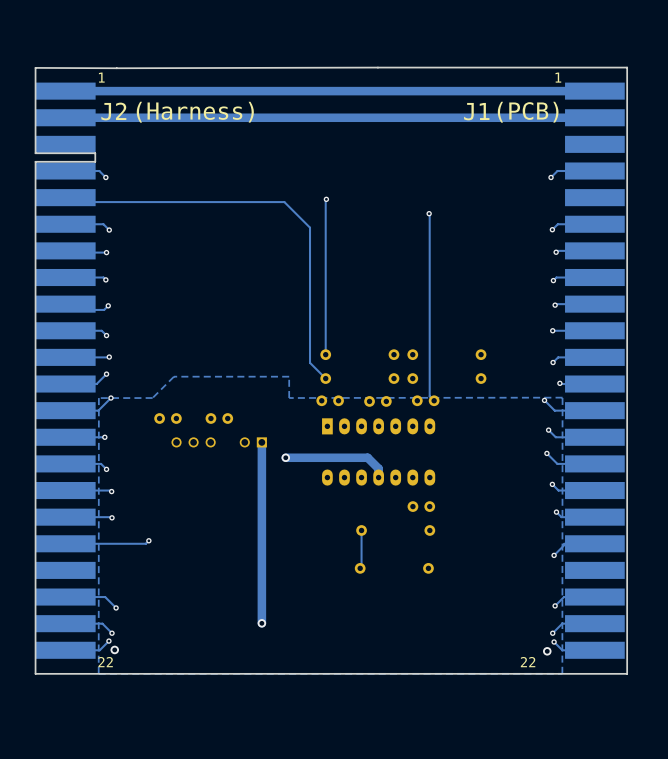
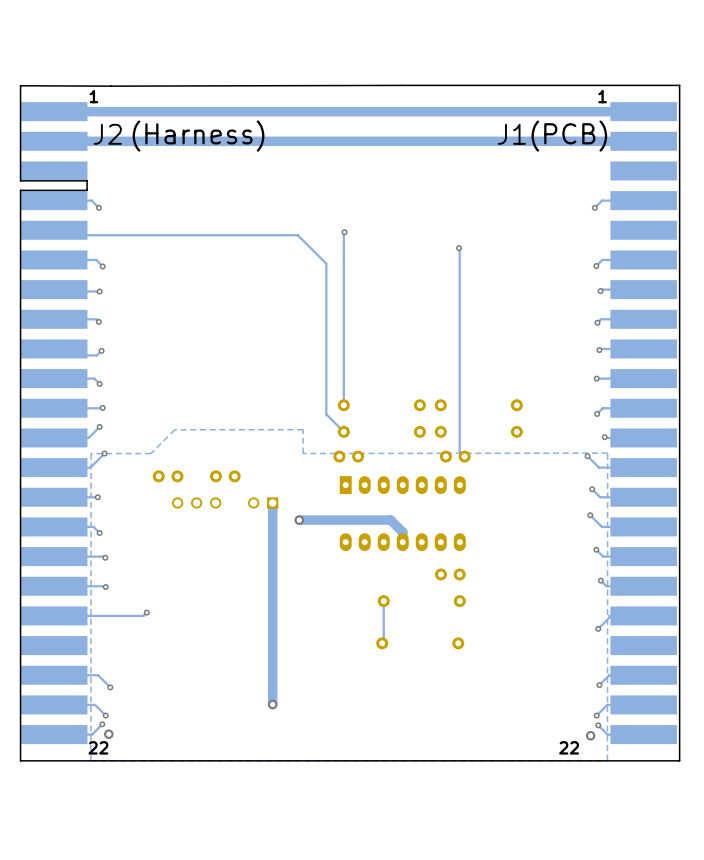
part: (377, 401) -> none

